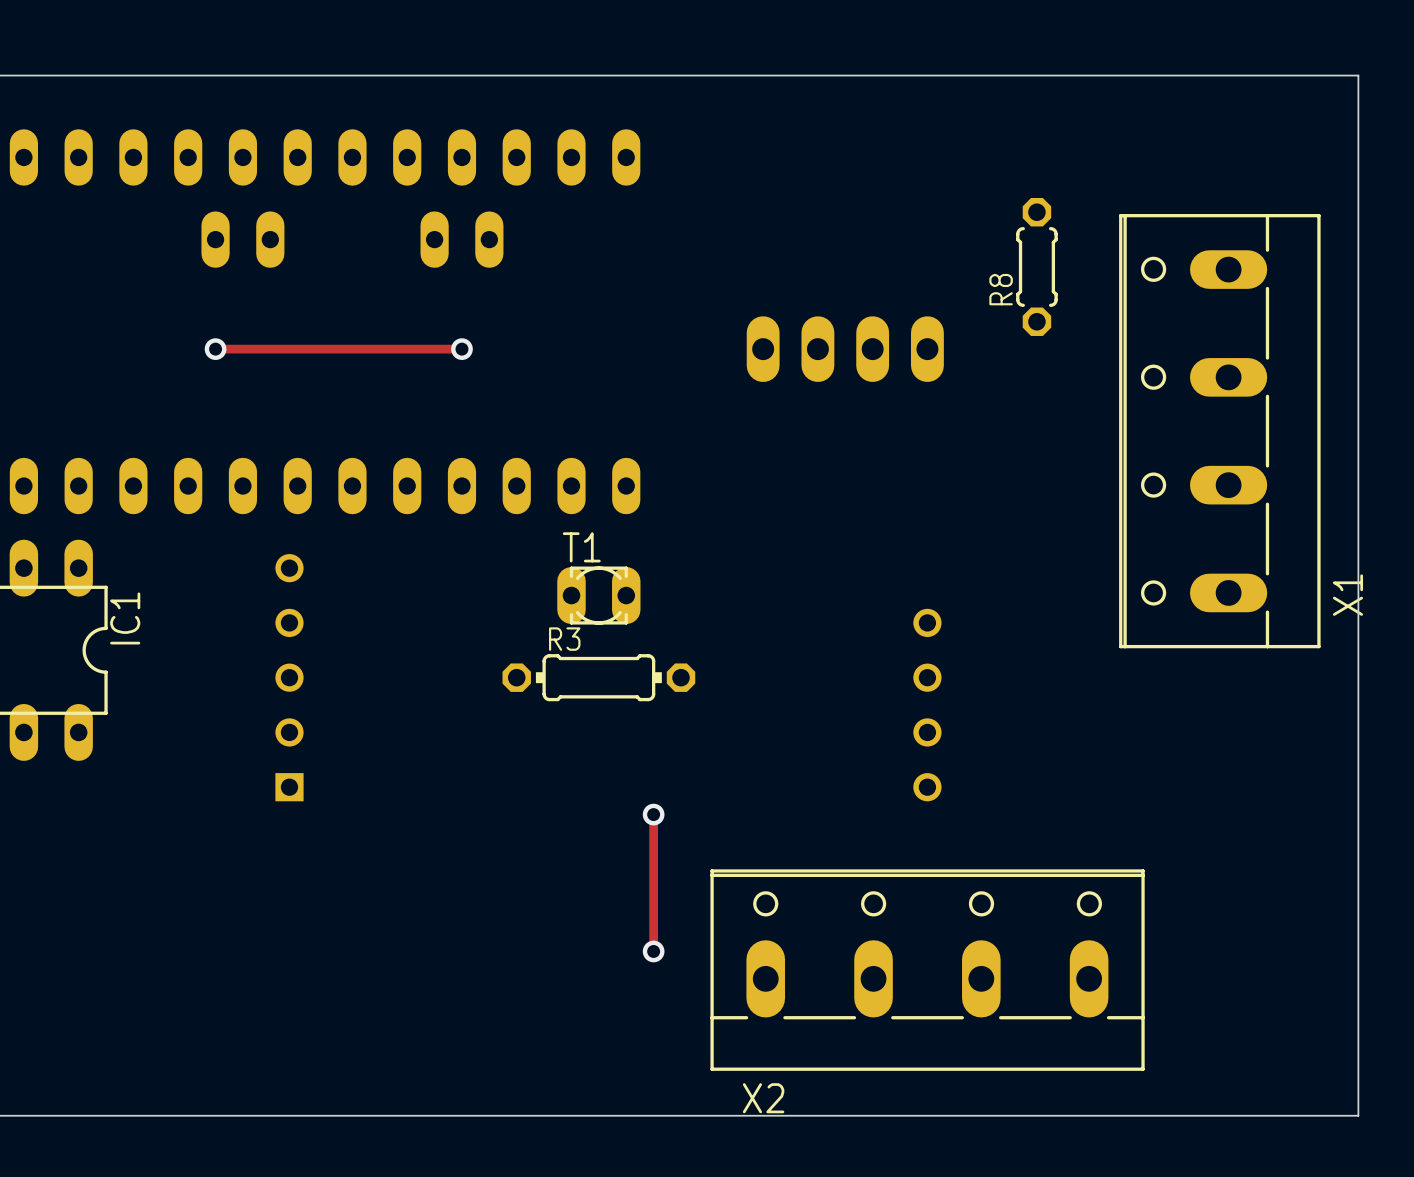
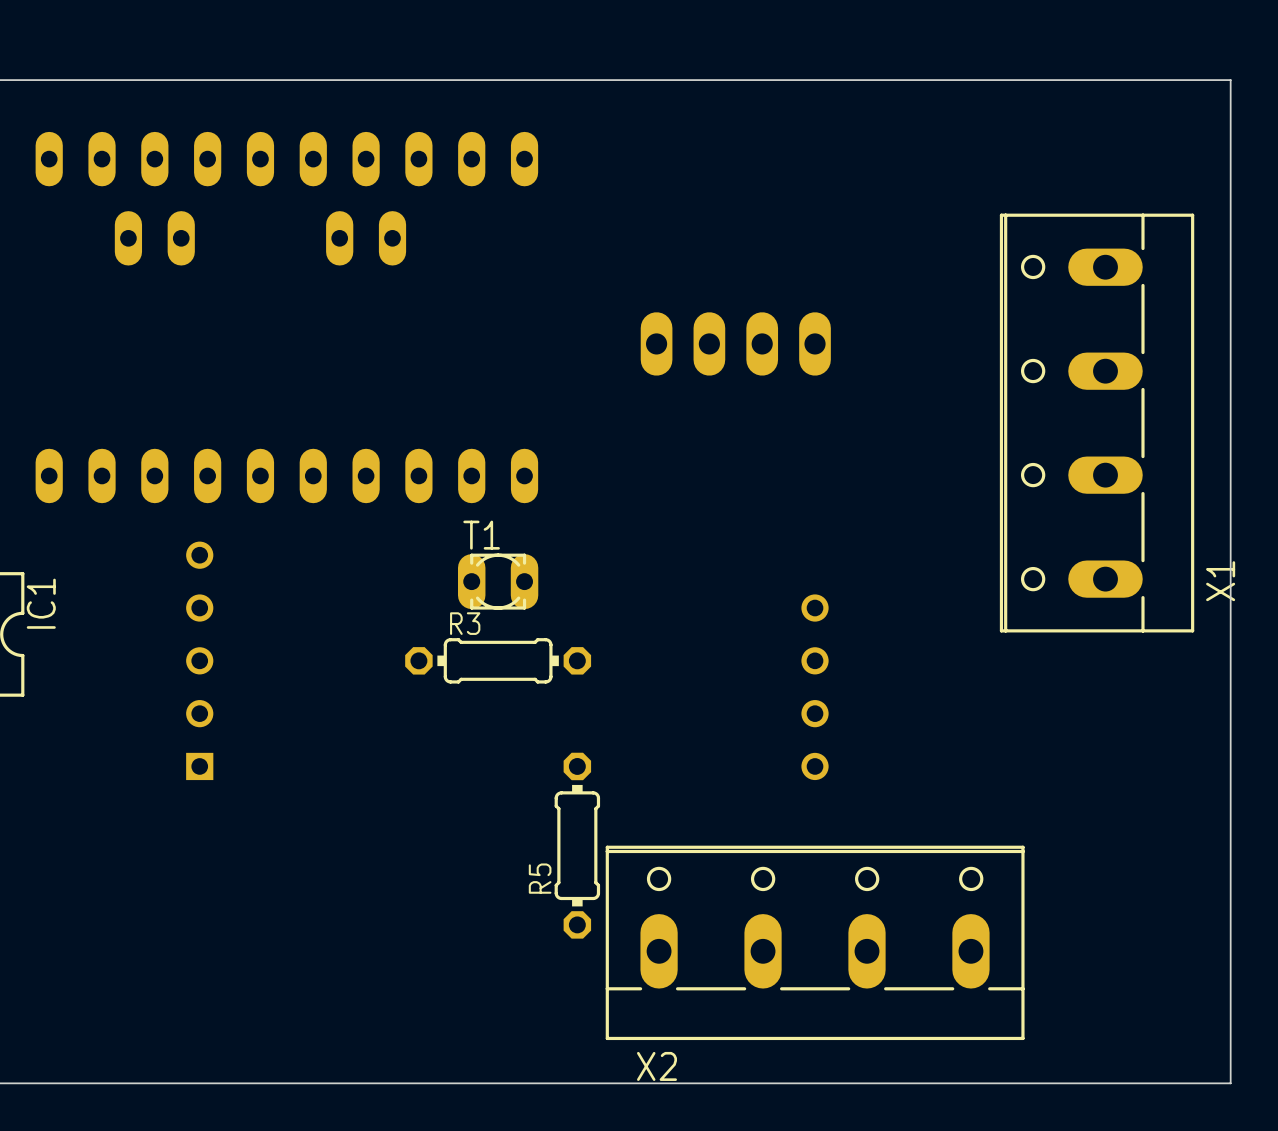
R8: (1036, 266) -> none
track: (215, 349) (461, 349) -> none
via: (215, 349) -> none
via: (461, 349) -> none
track: (653, 814) (653, 951) -> none
via: (653, 814) -> none
R5: none -> (577, 845)
via: (653, 951) -> none

